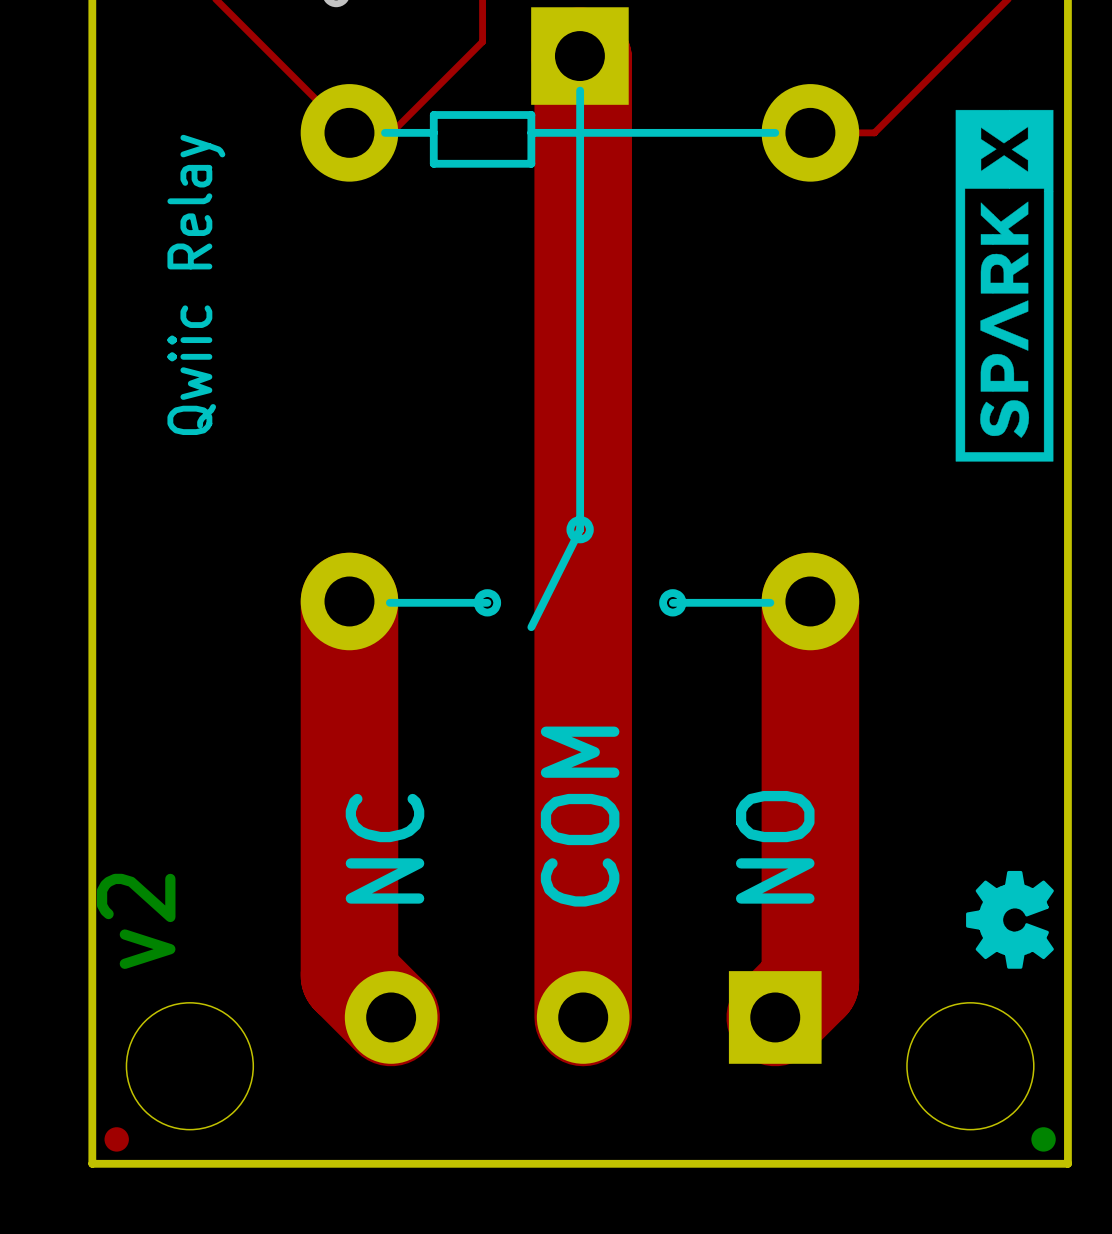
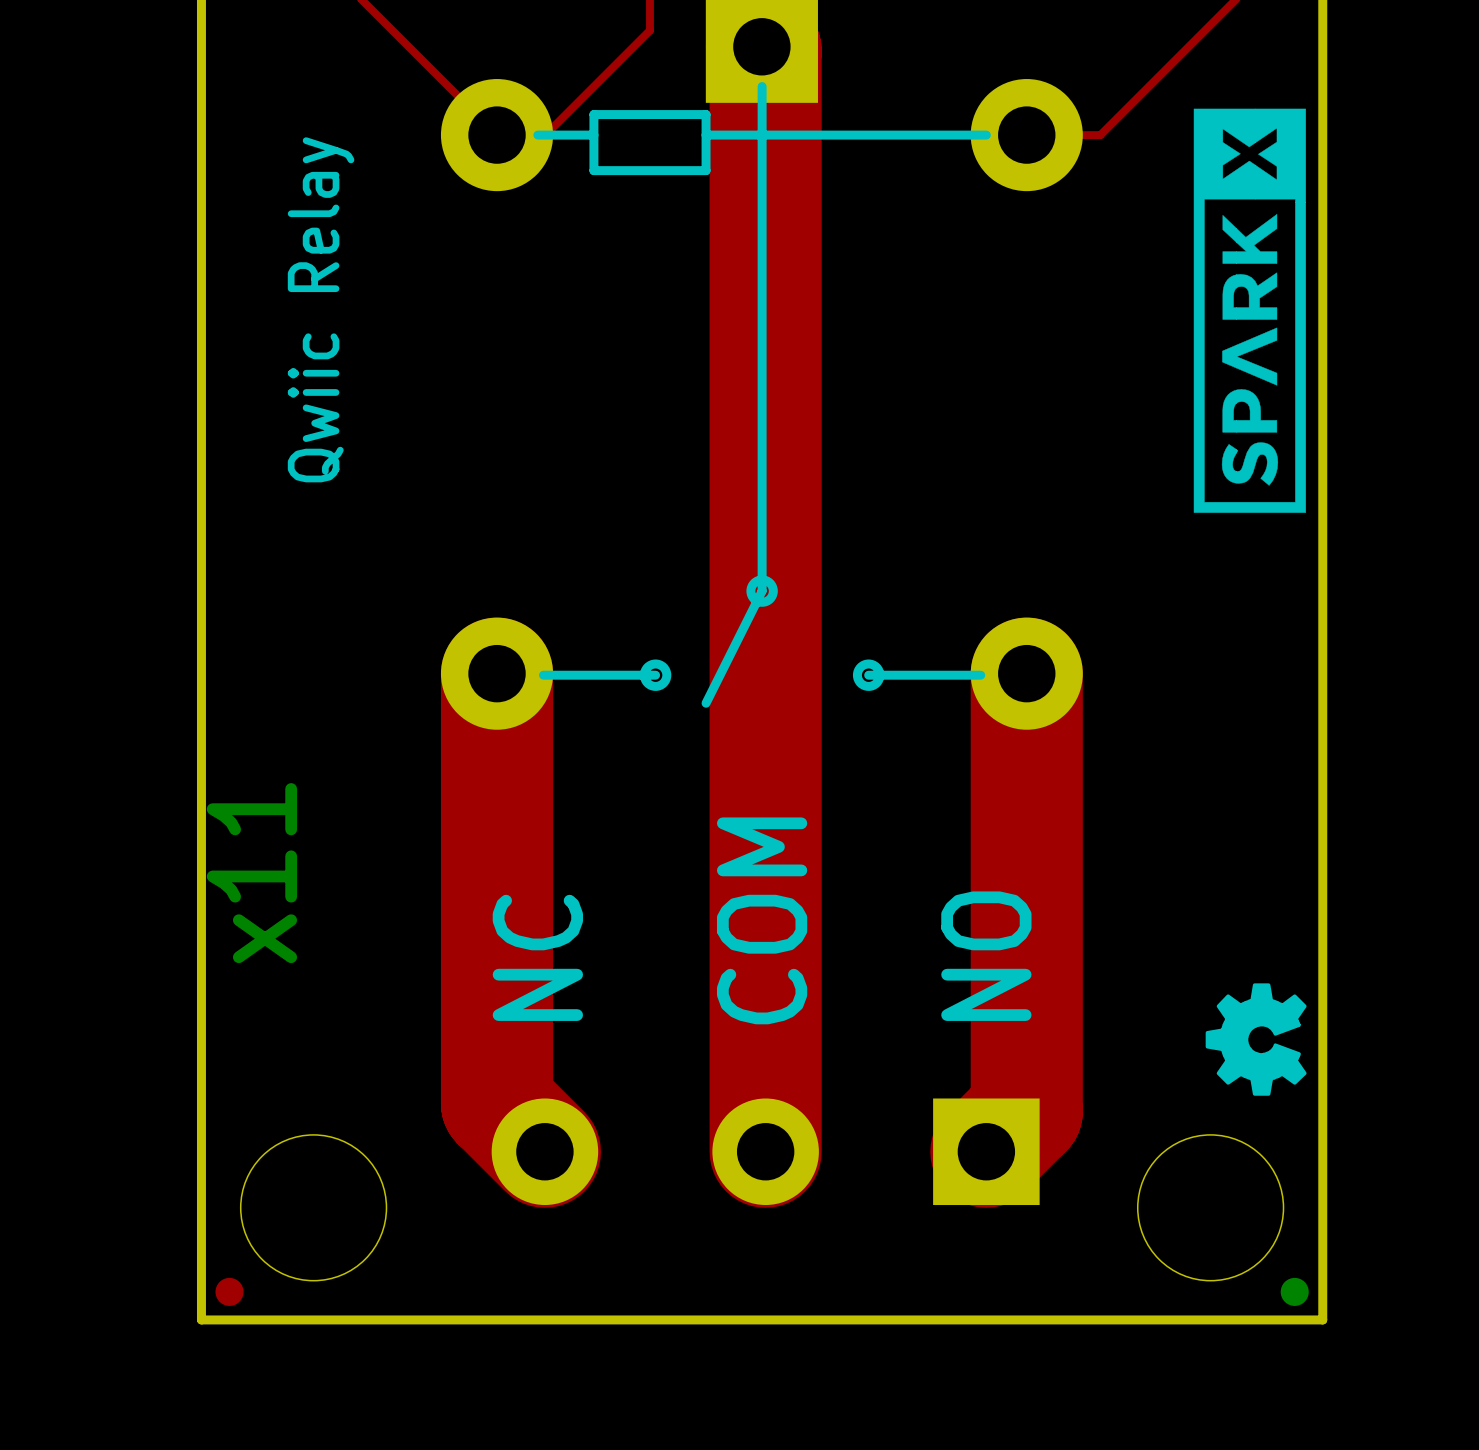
text: none -> x11 (251, 873)
text: v2 (136, 921) -> none

